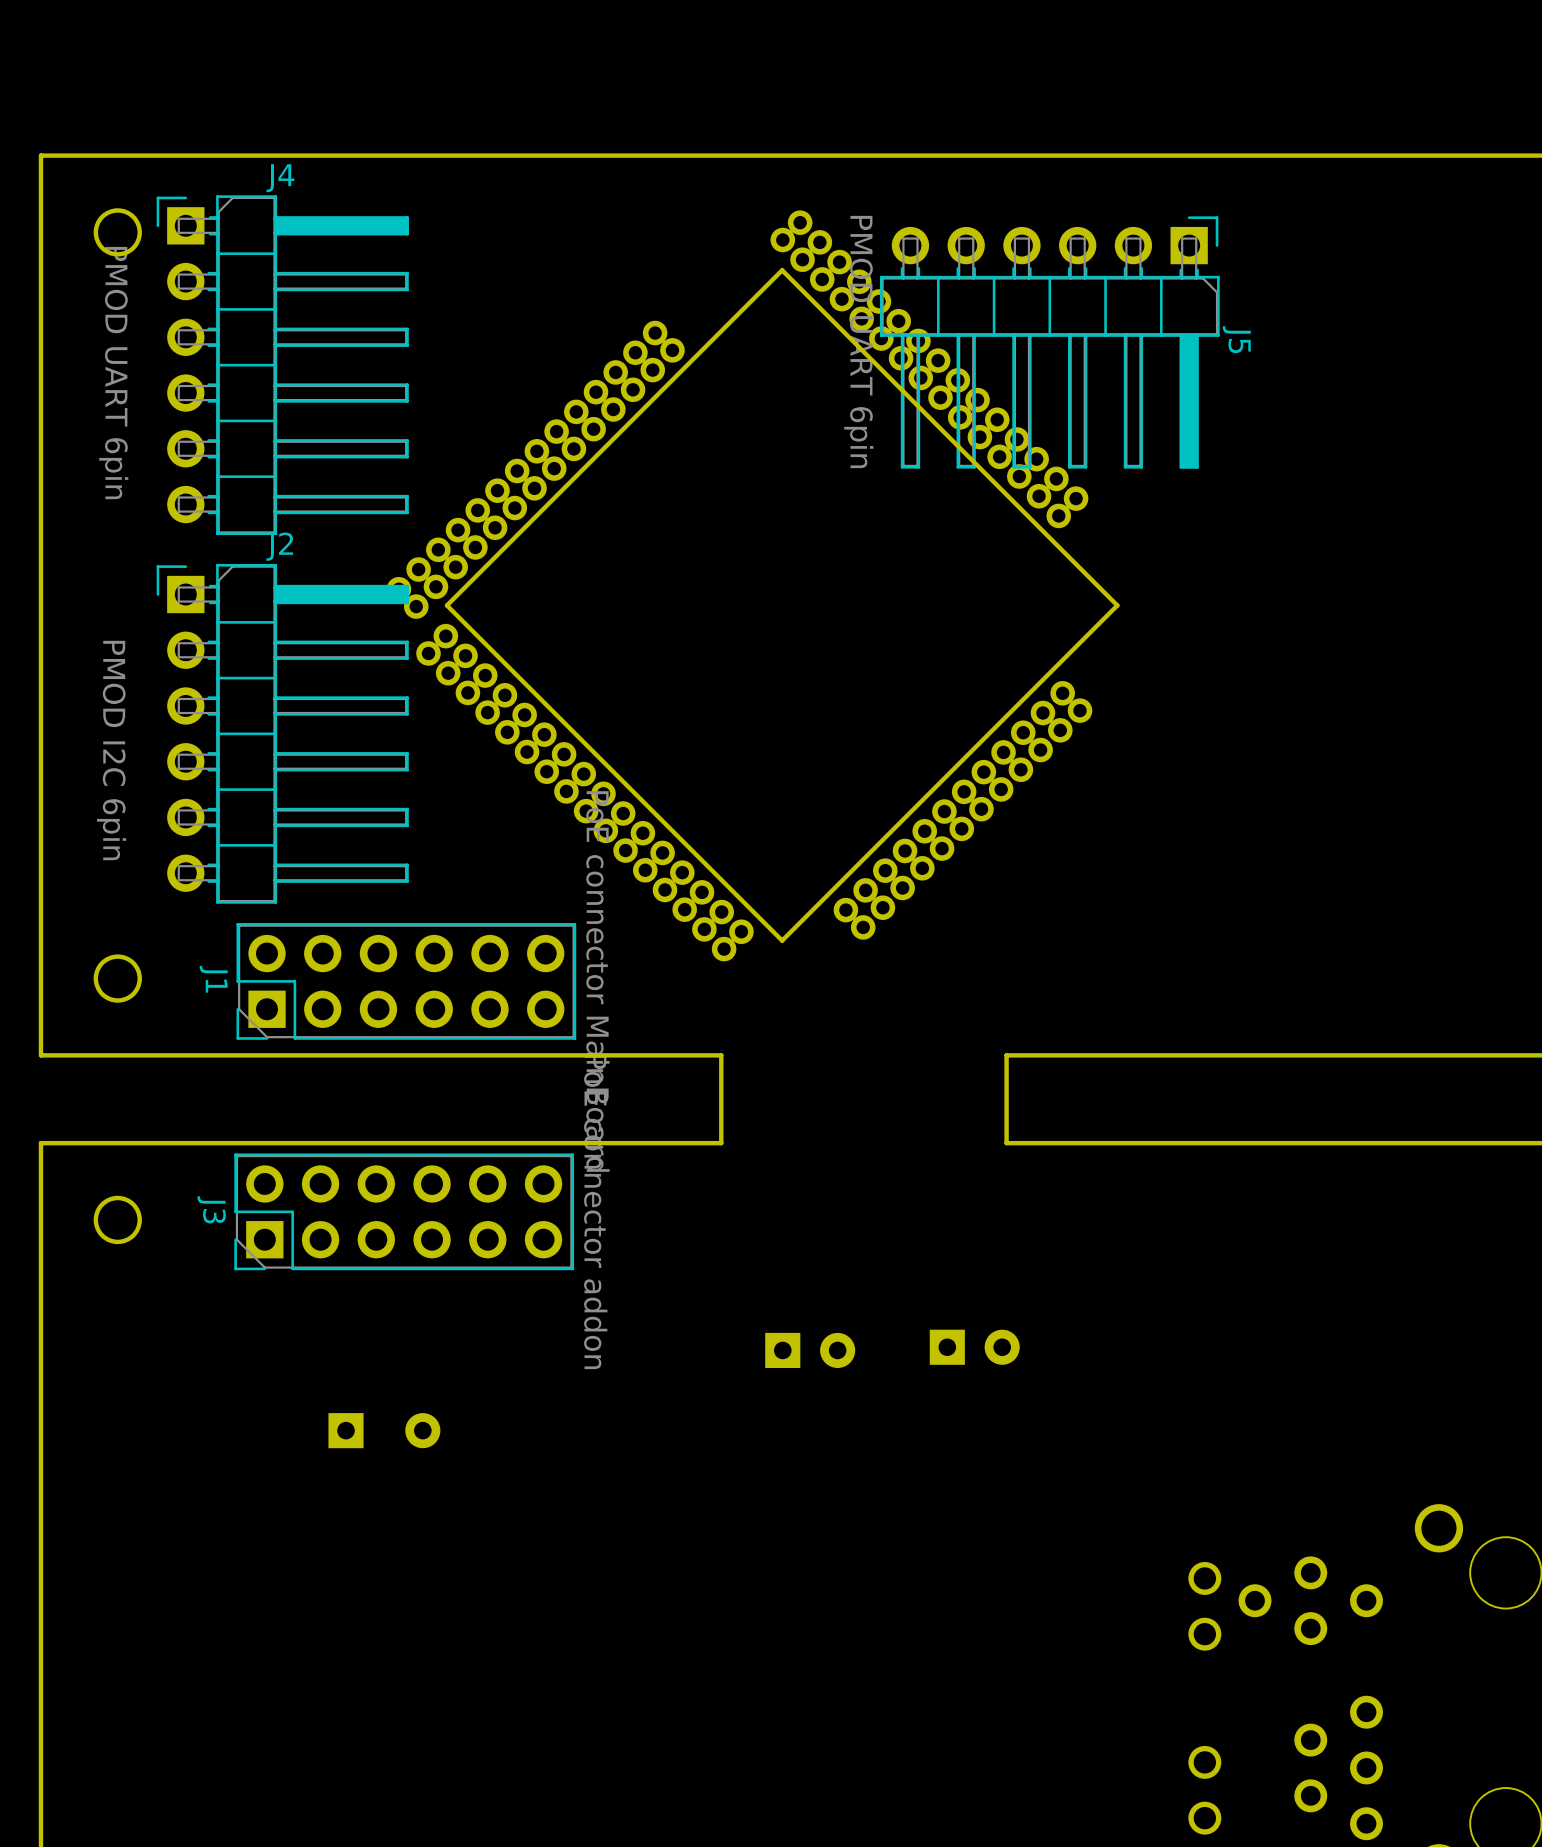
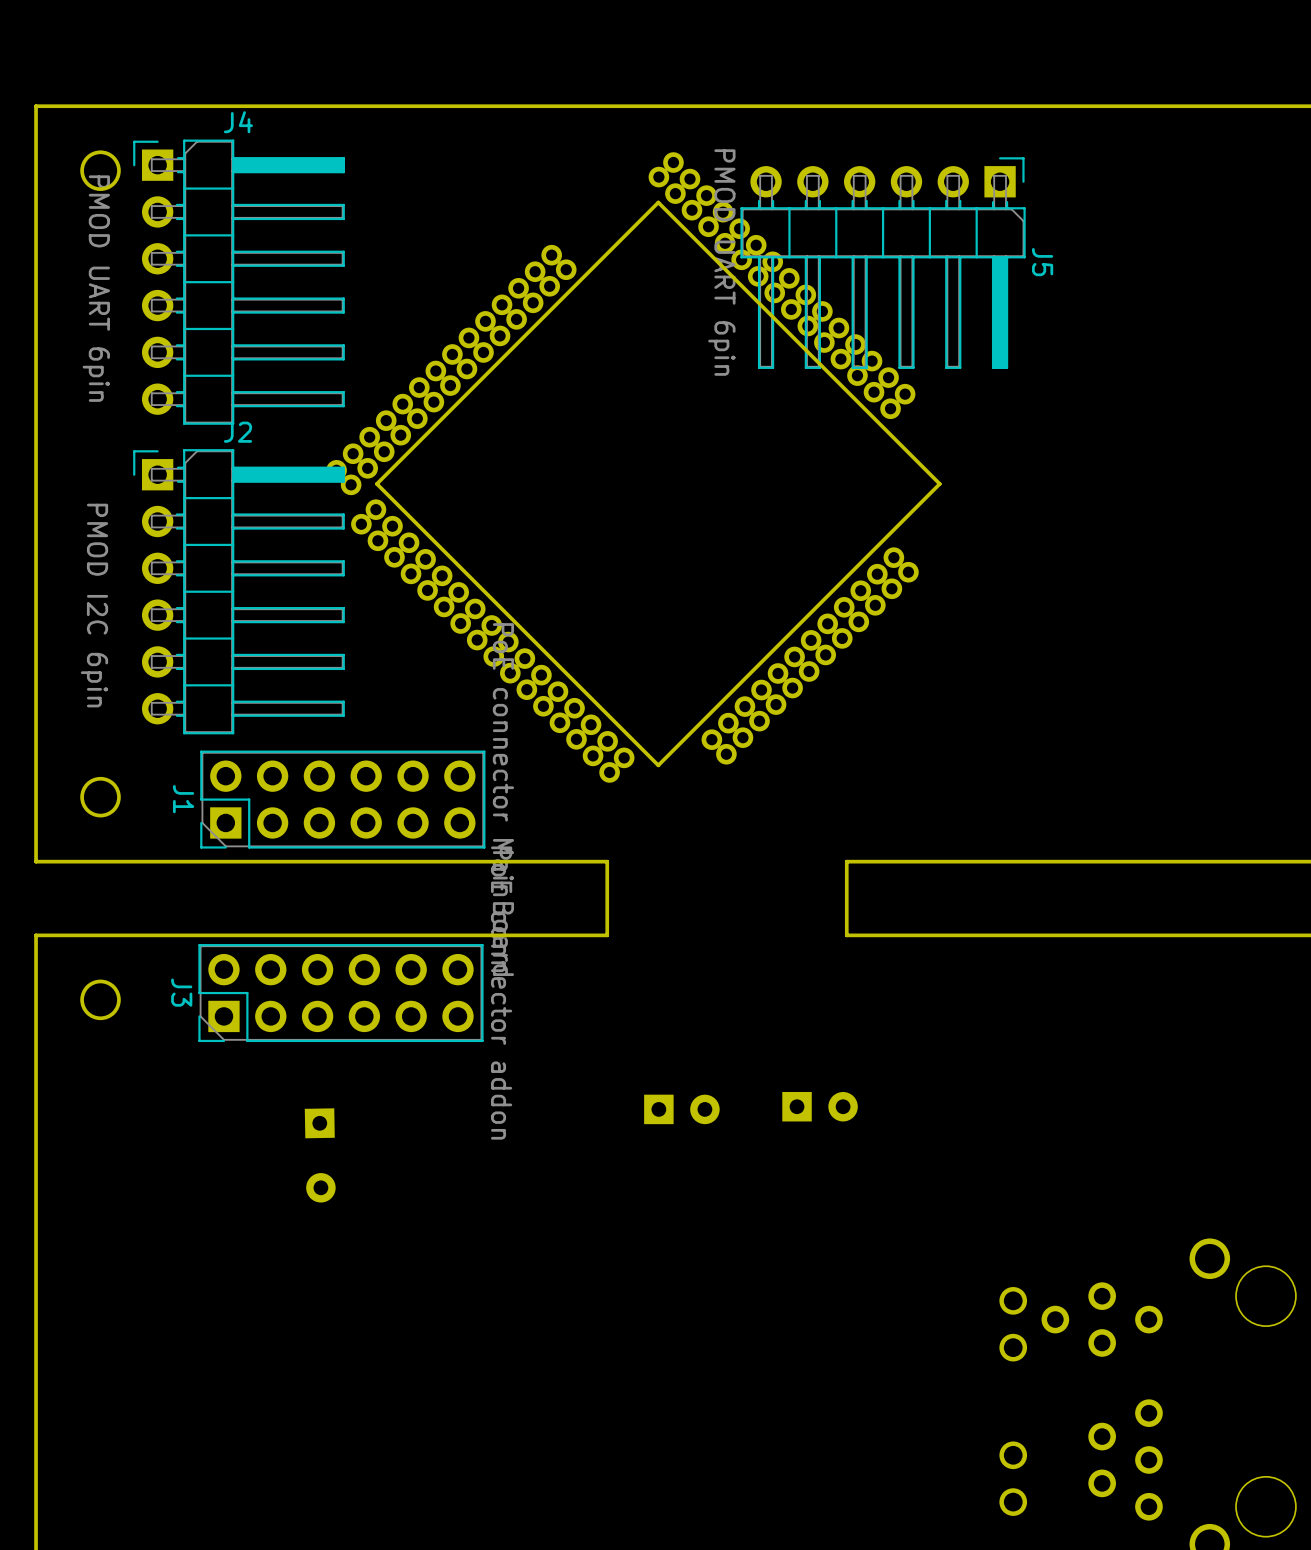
part: none -> (320, 1155)
part: (384, 1430) -> none

